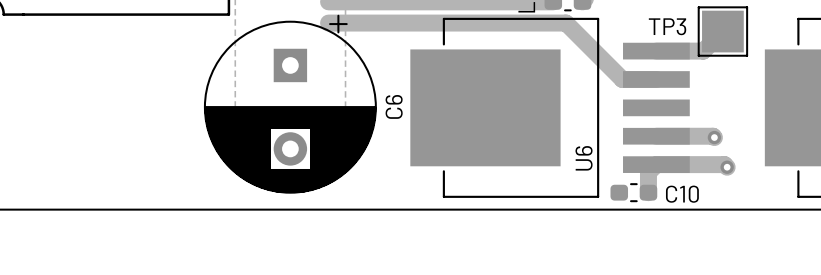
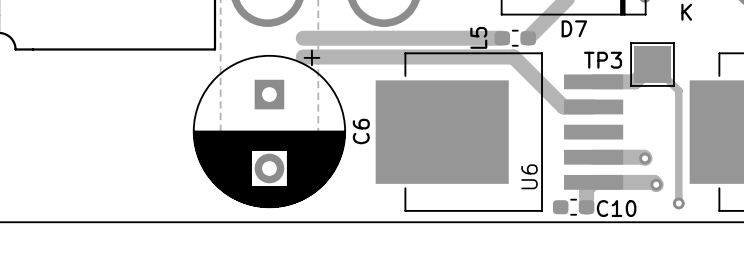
track: none -> (652, 64) (678, 90) (678, 203)
via: none -> (678, 203)

